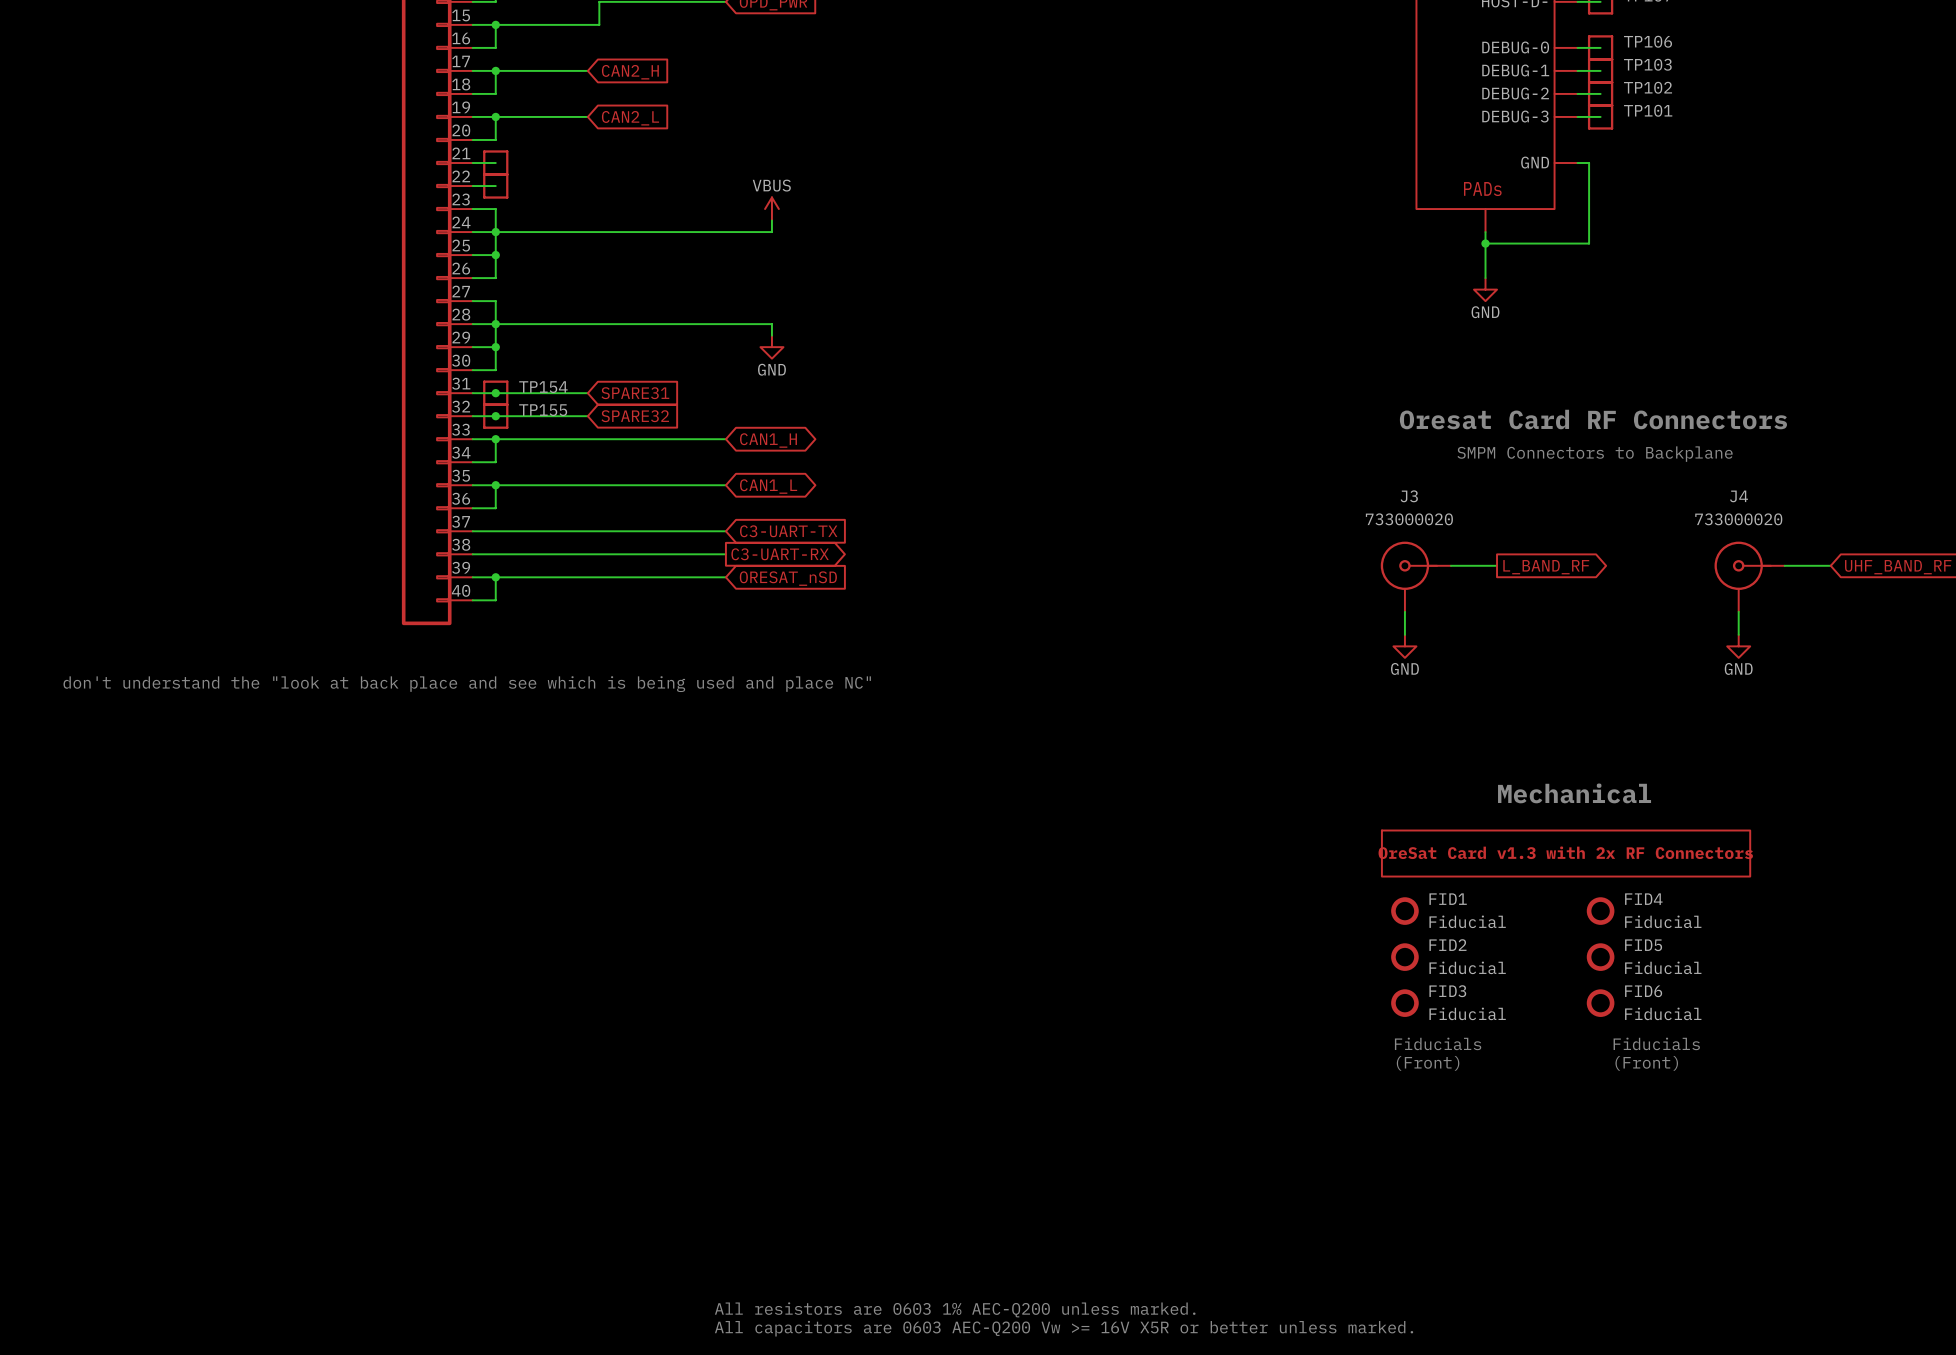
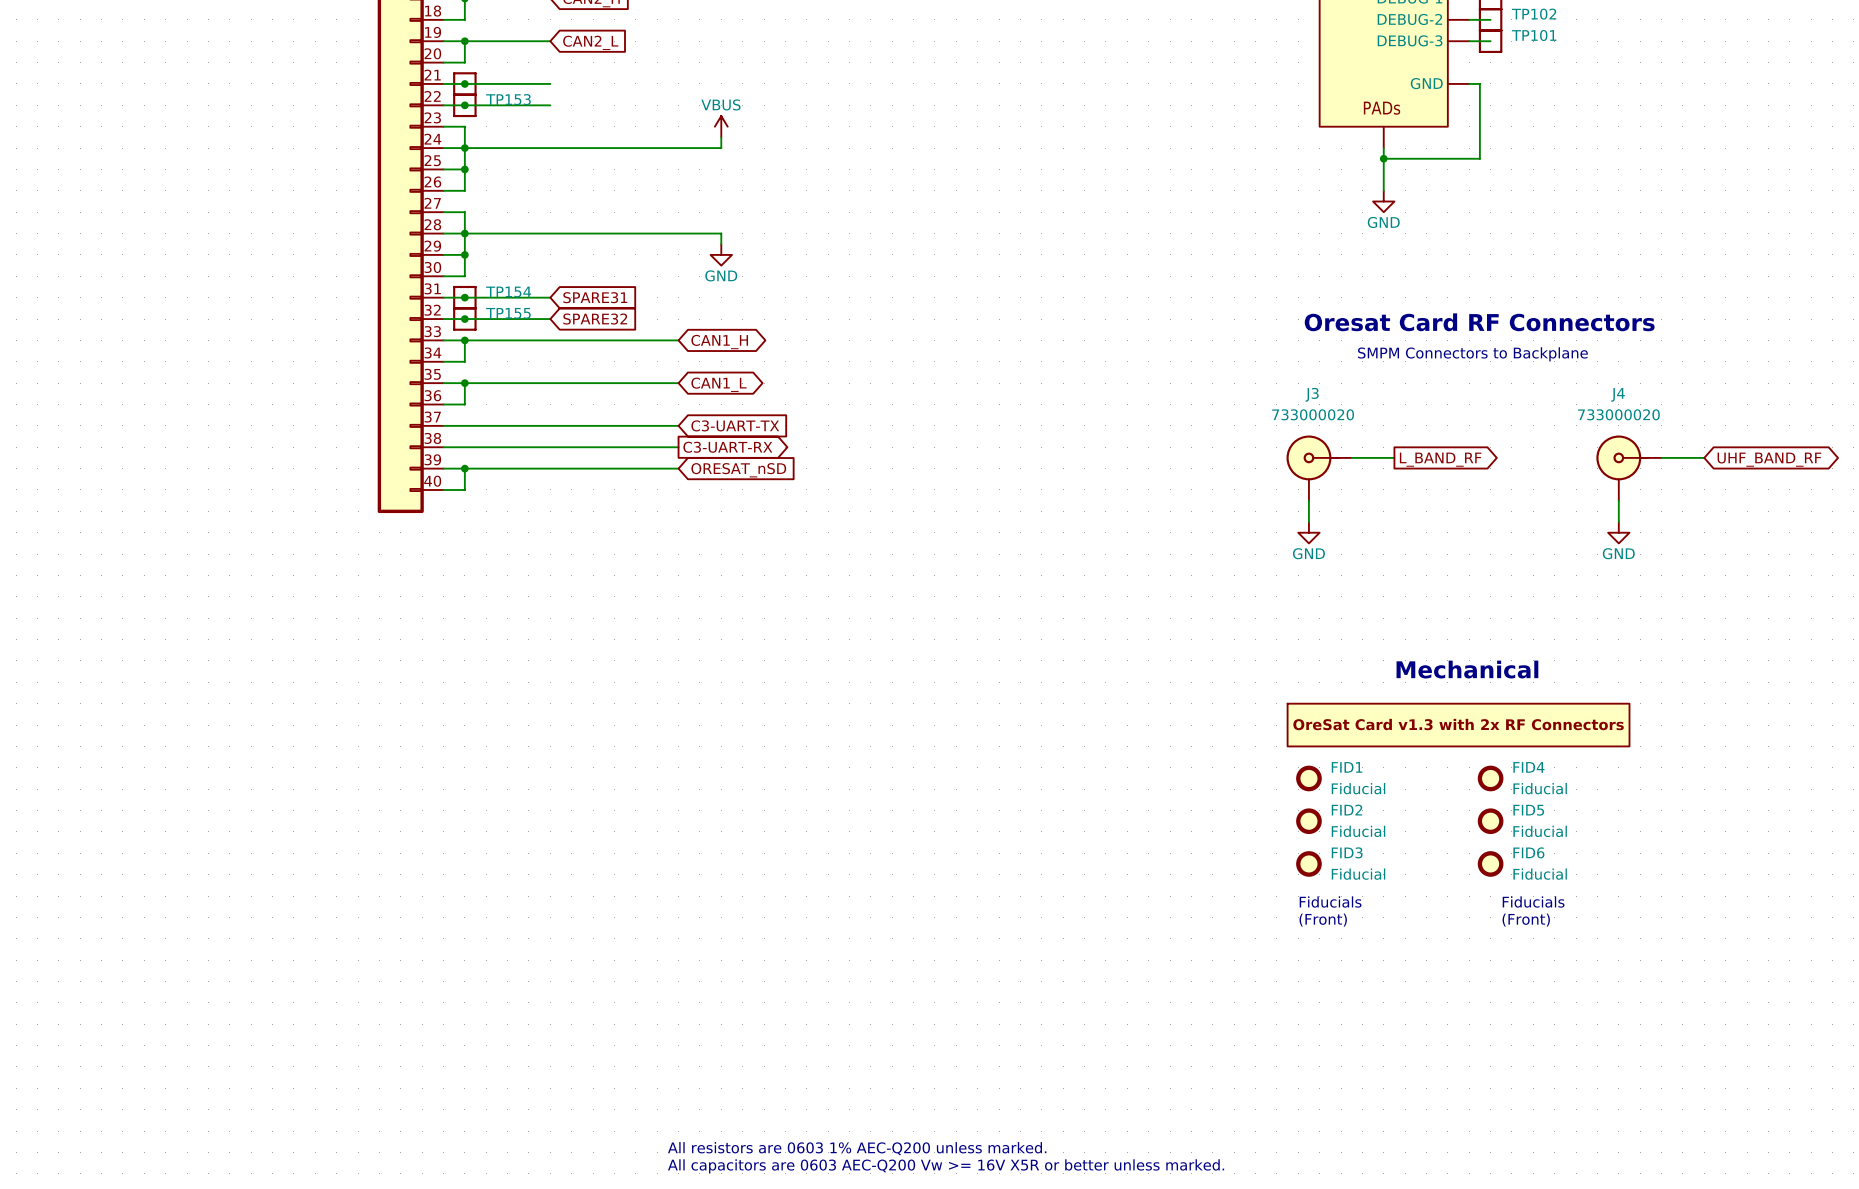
wire: none -> (464, 83) (550, 83)
junction: none -> (464, 83)
TP153 name: none -> TP153 (508, 99)
wire: none -> (464, 105) (550, 105)
junction: none -> (464, 105)
text: don't understand the "look at back place and see which is being used and place NC" (467, 684) -> none

